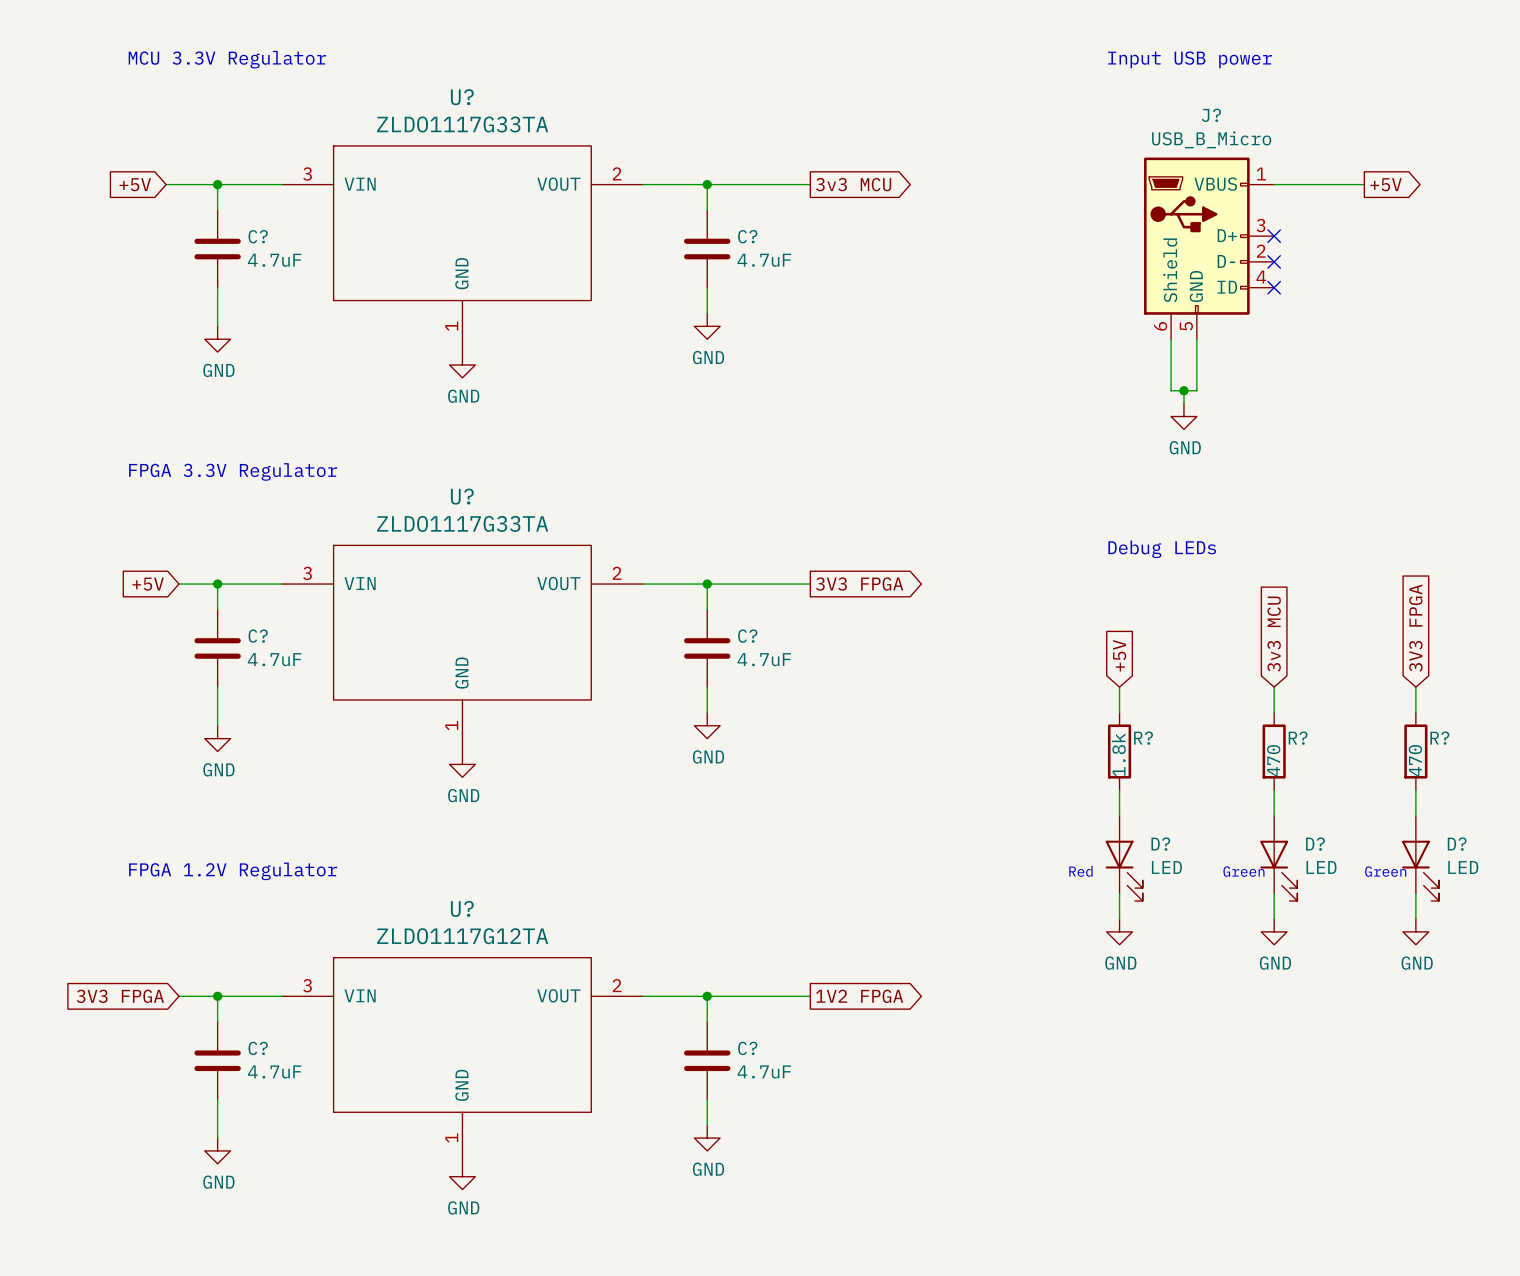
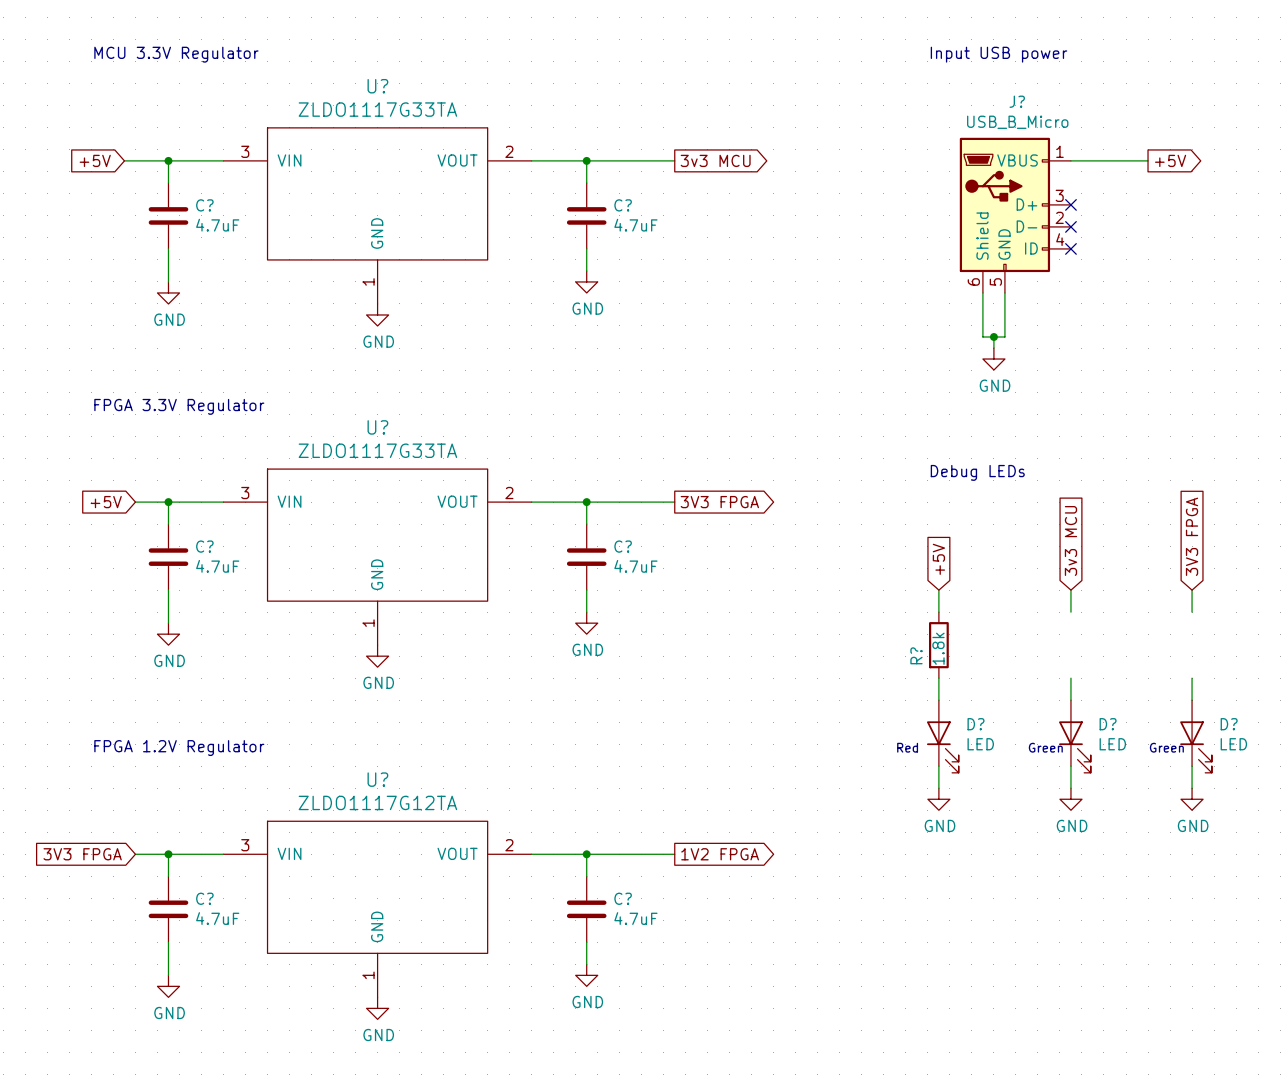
R? name rotation: 0° (1143, 738) -> 90° counterclockwise (916, 655)
R? name position: R? (1143, 738) -> R? (916, 655)
R?: 470 (1274, 751) -> none
R?: 470 (1415, 751) -> none

